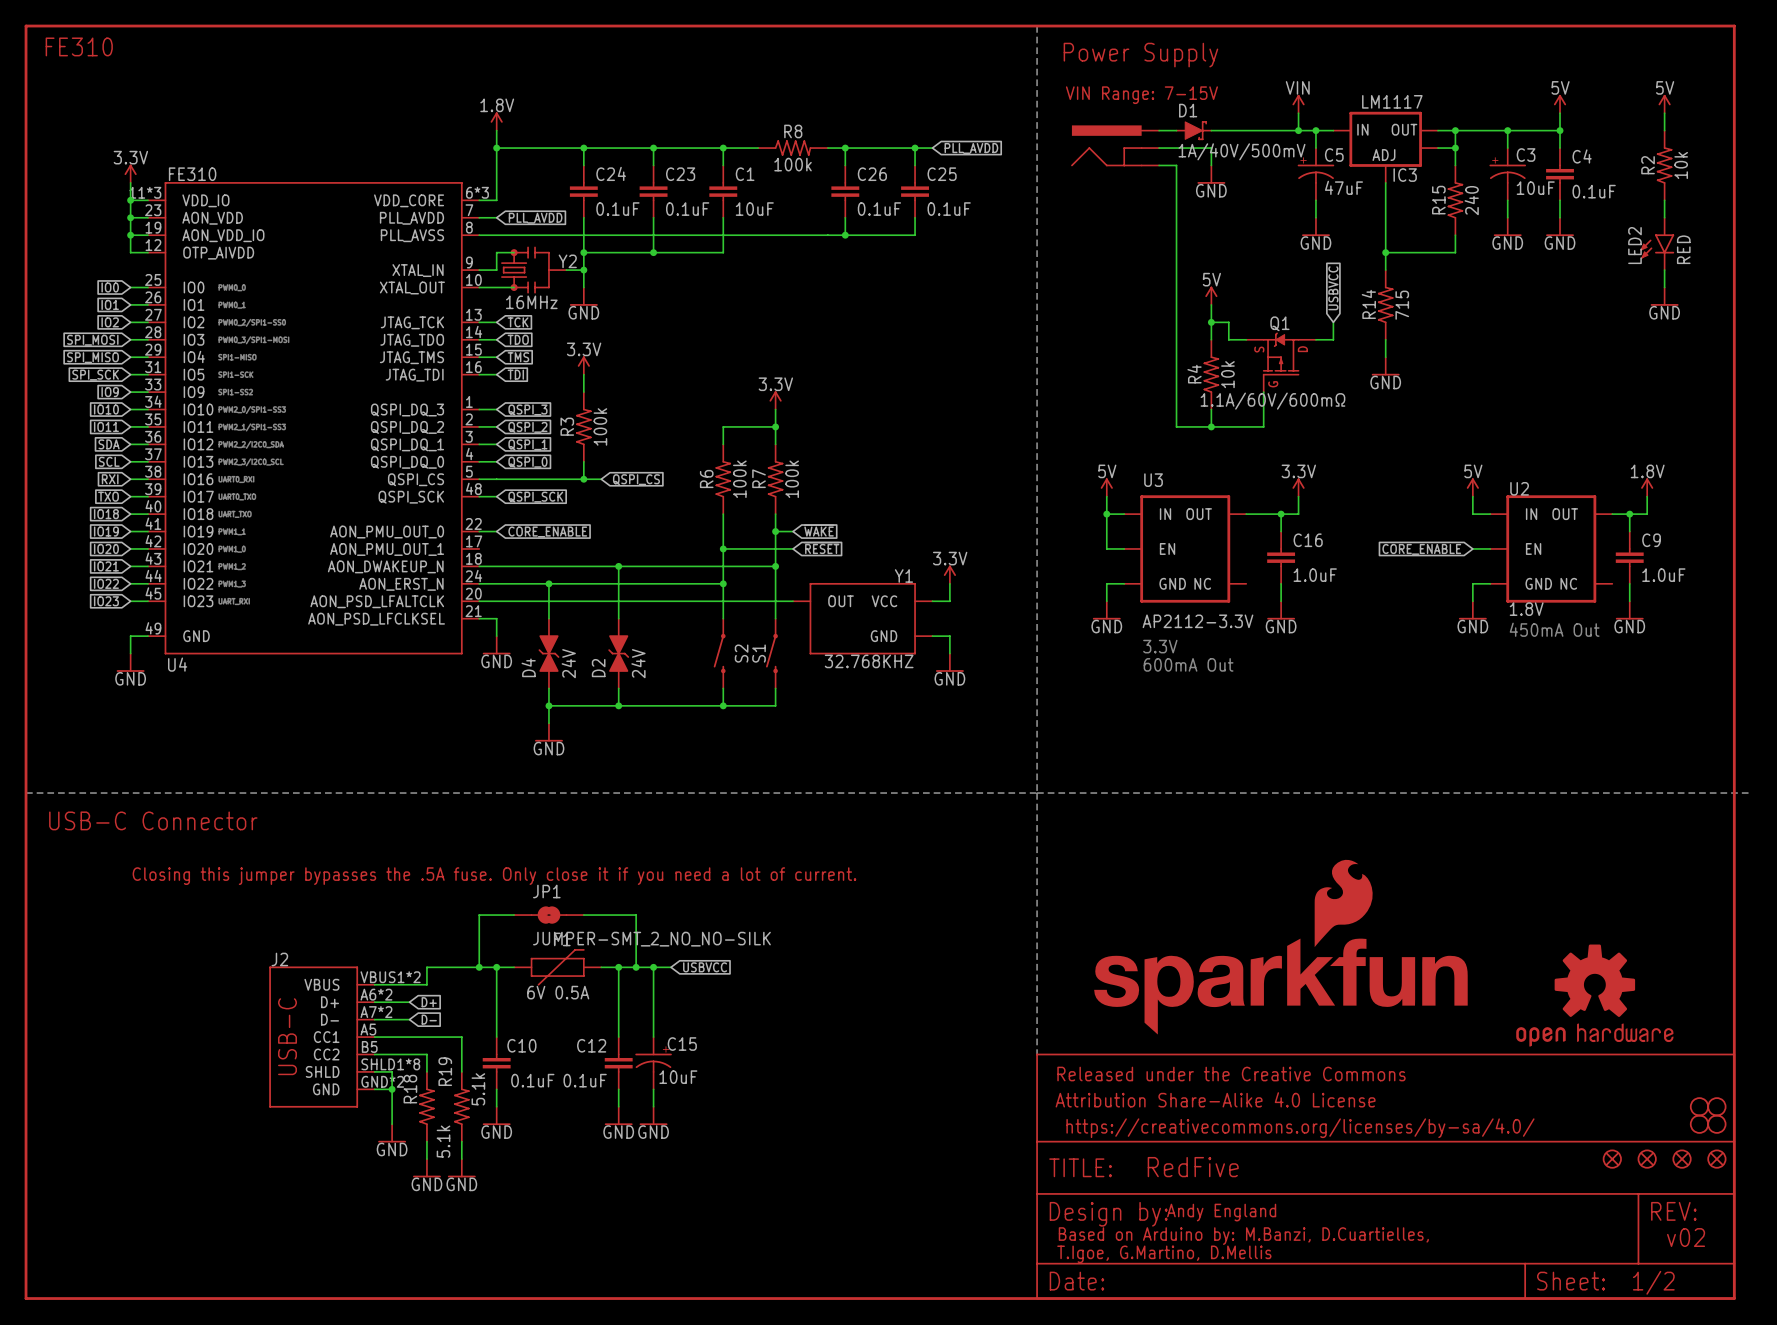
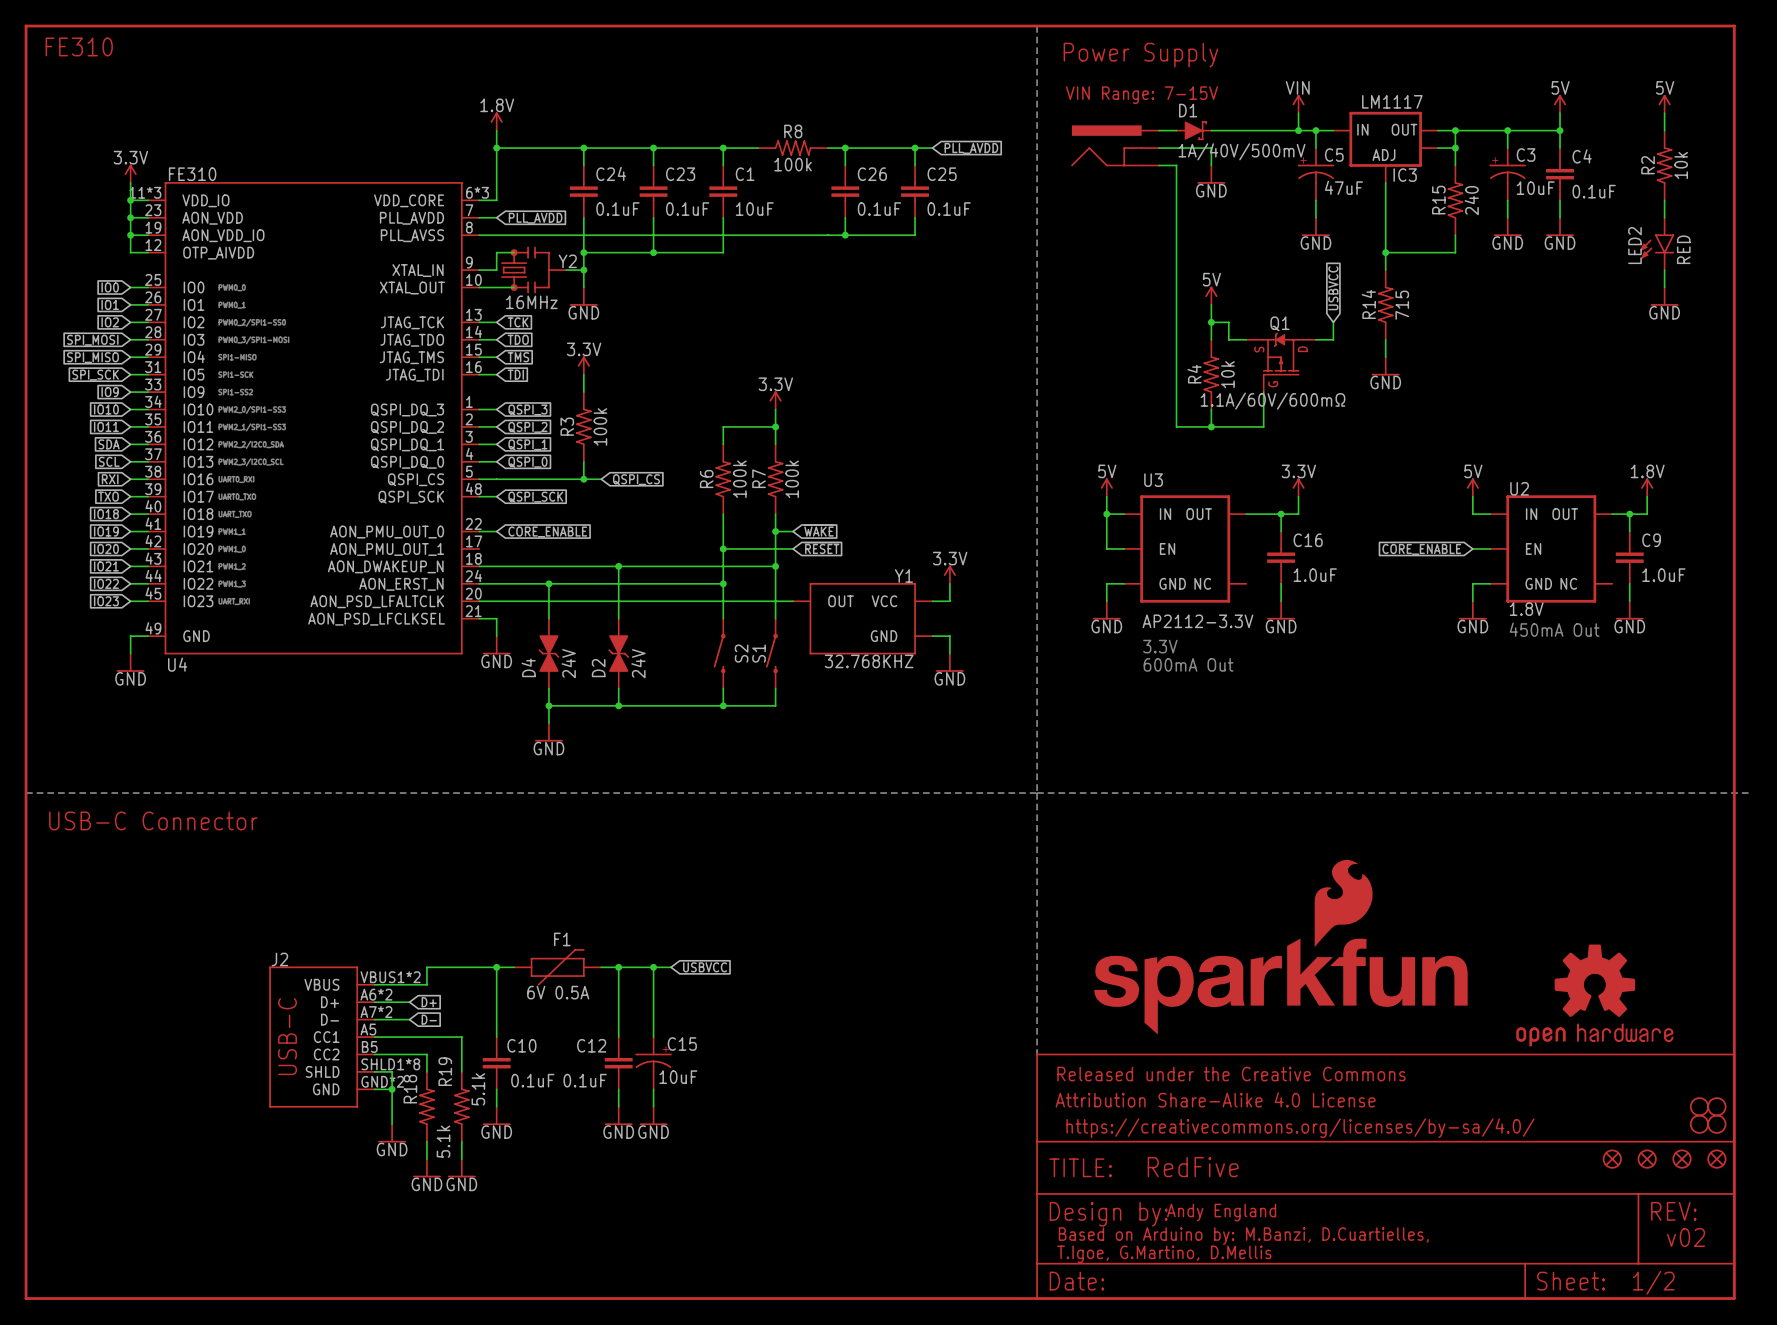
text: Closing this jumper bypasses the .5A fuse. Only close it if you need a lot of current. (494, 876) -> none
wire: (514, 915) (479, 915) (479, 967) -> none
JP1: JUMPER-SMT_2_NO_NO-SILK (548, 915) -> none
wire: (583, 915) (636, 915) (636, 967) -> none
junction: (479, 967) -> none
junction: (636, 967) -> none

